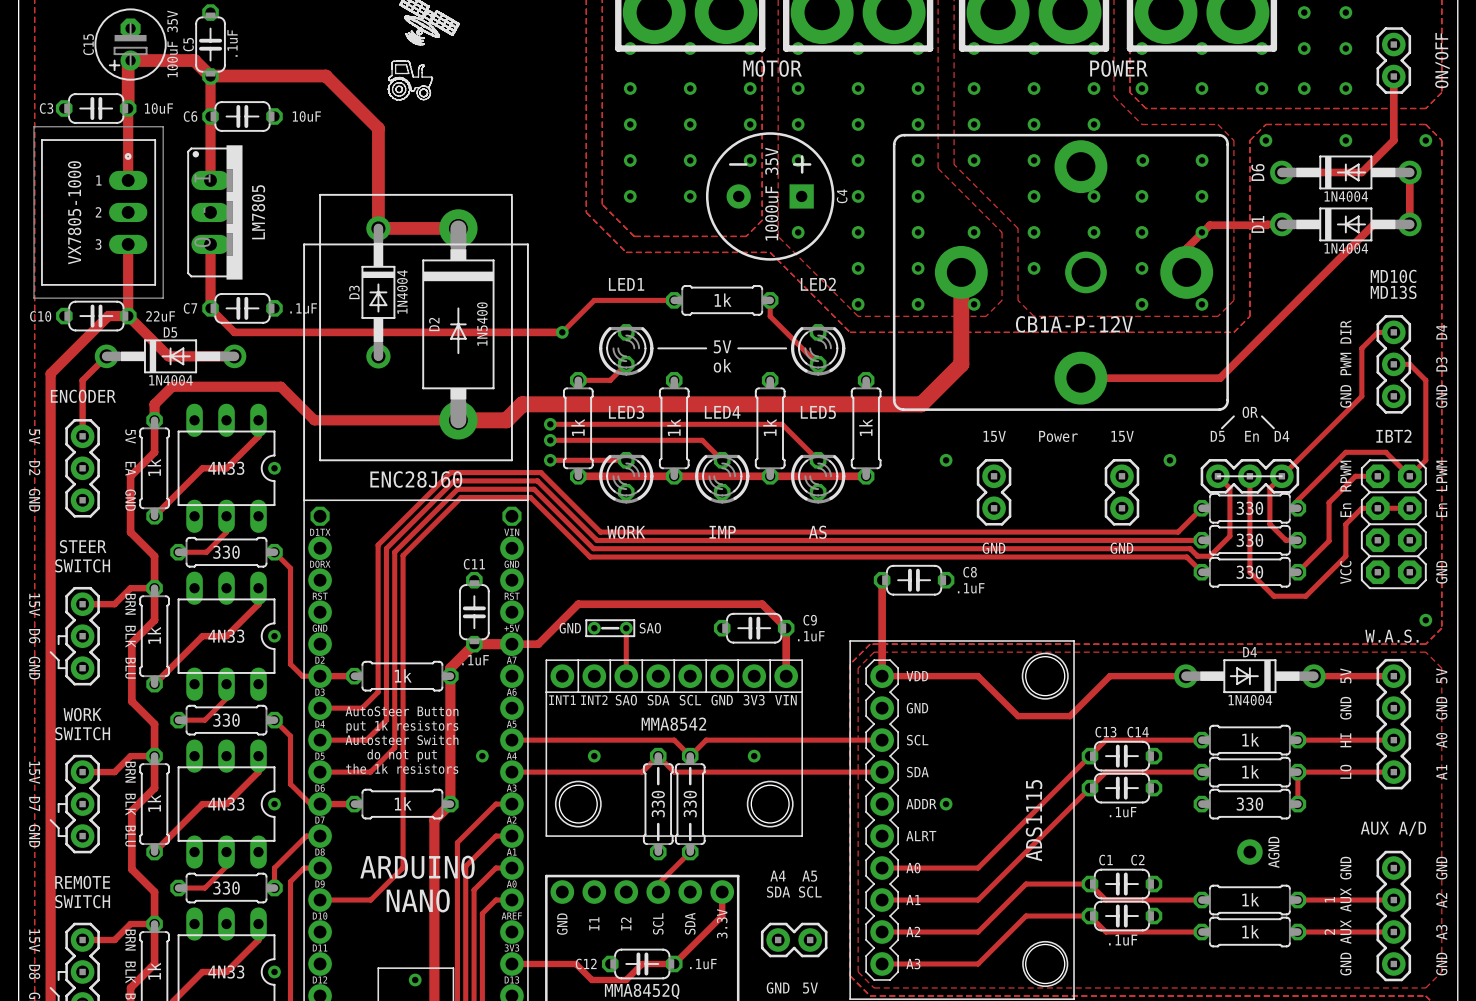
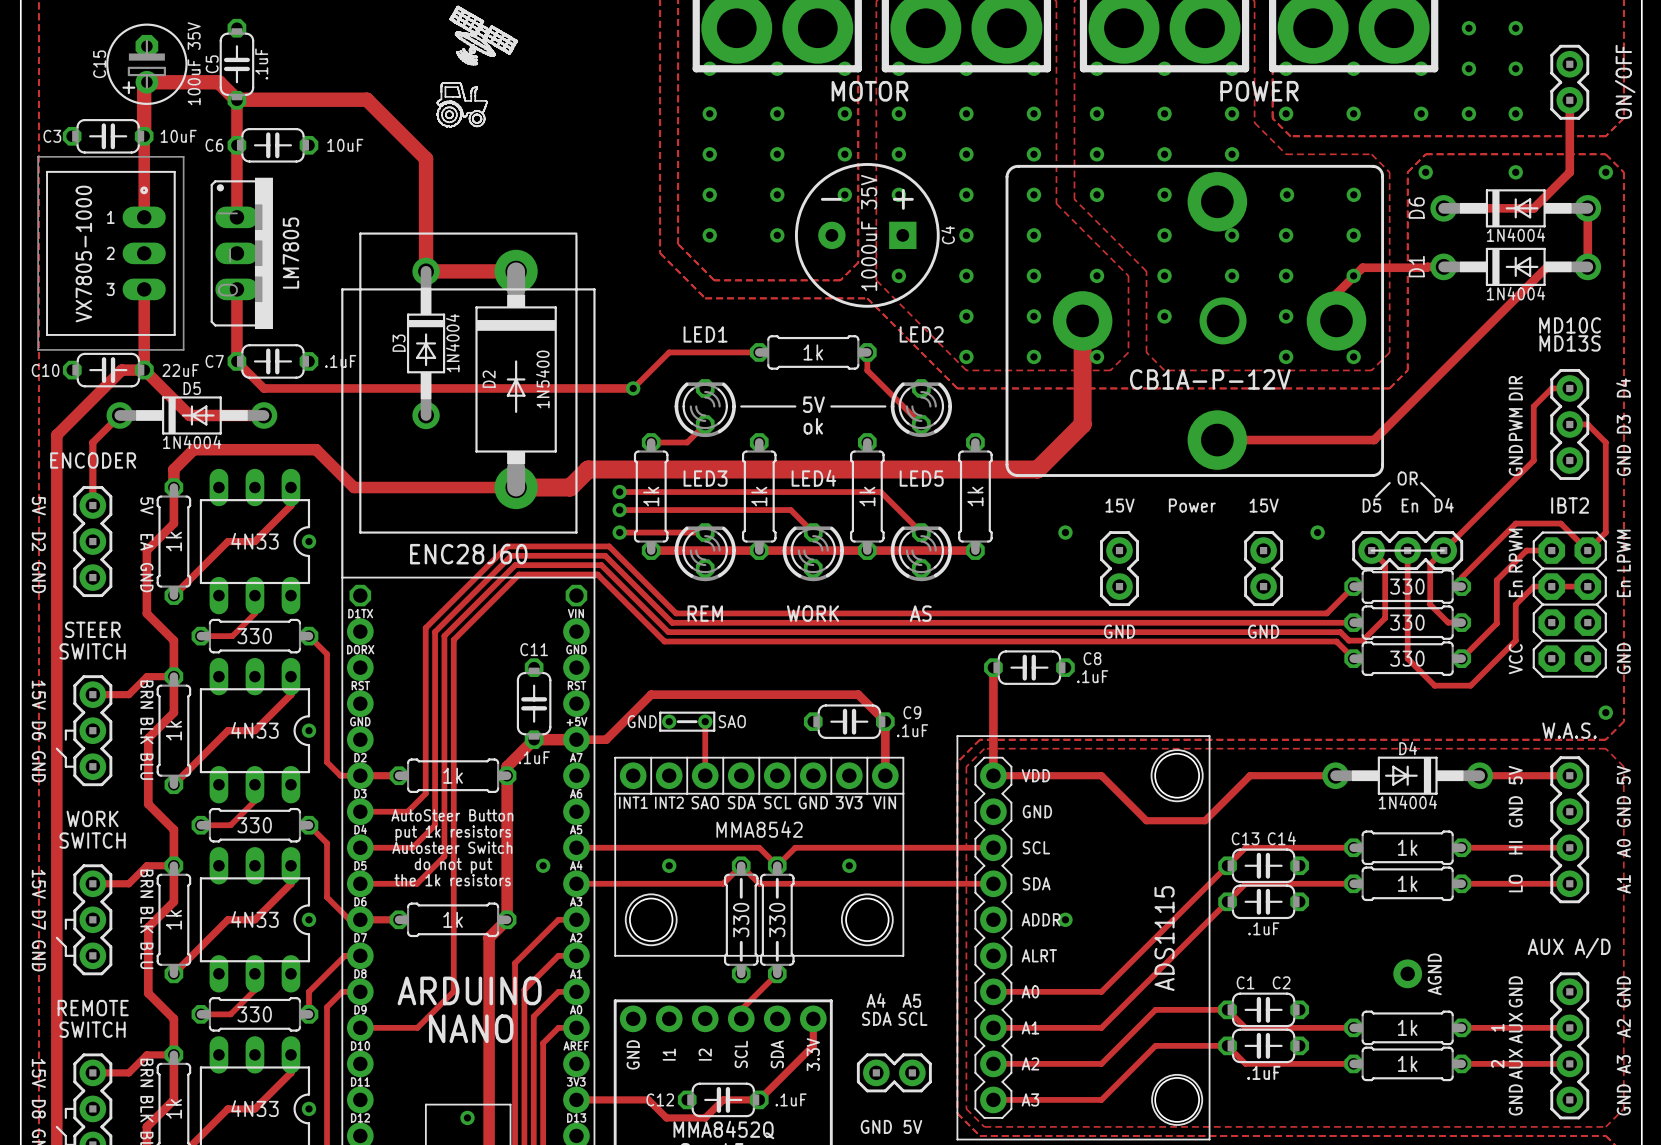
text: WORK (626, 532) -> REM (705, 613)
text: IMP (722, 532) -> WORK (813, 613)
track: (1297, 772) (1297, 804) -> none
part: 330 (1249, 804) -> none

